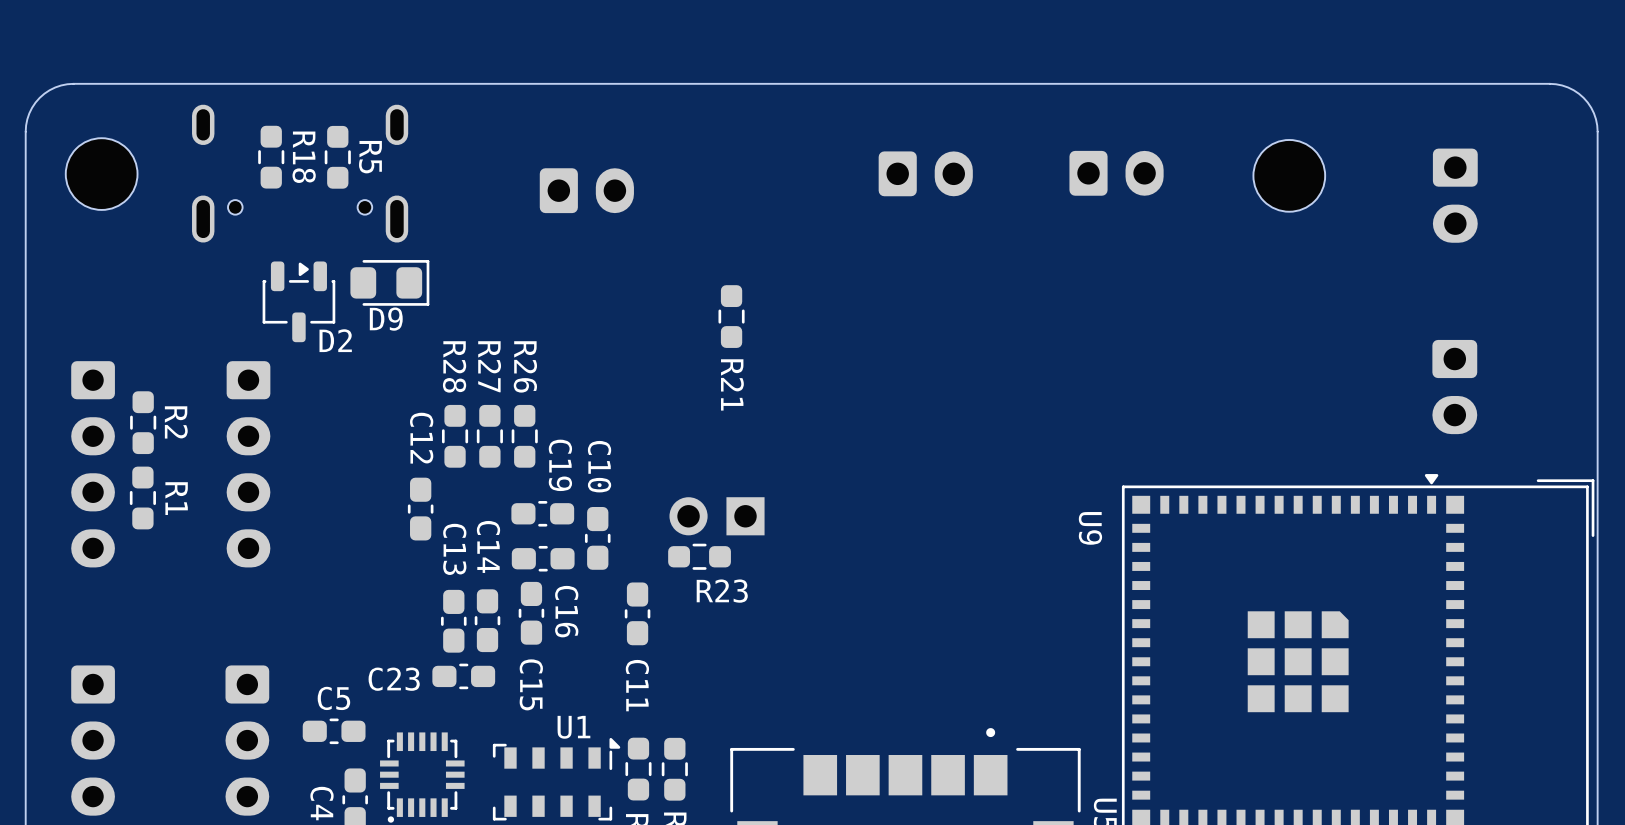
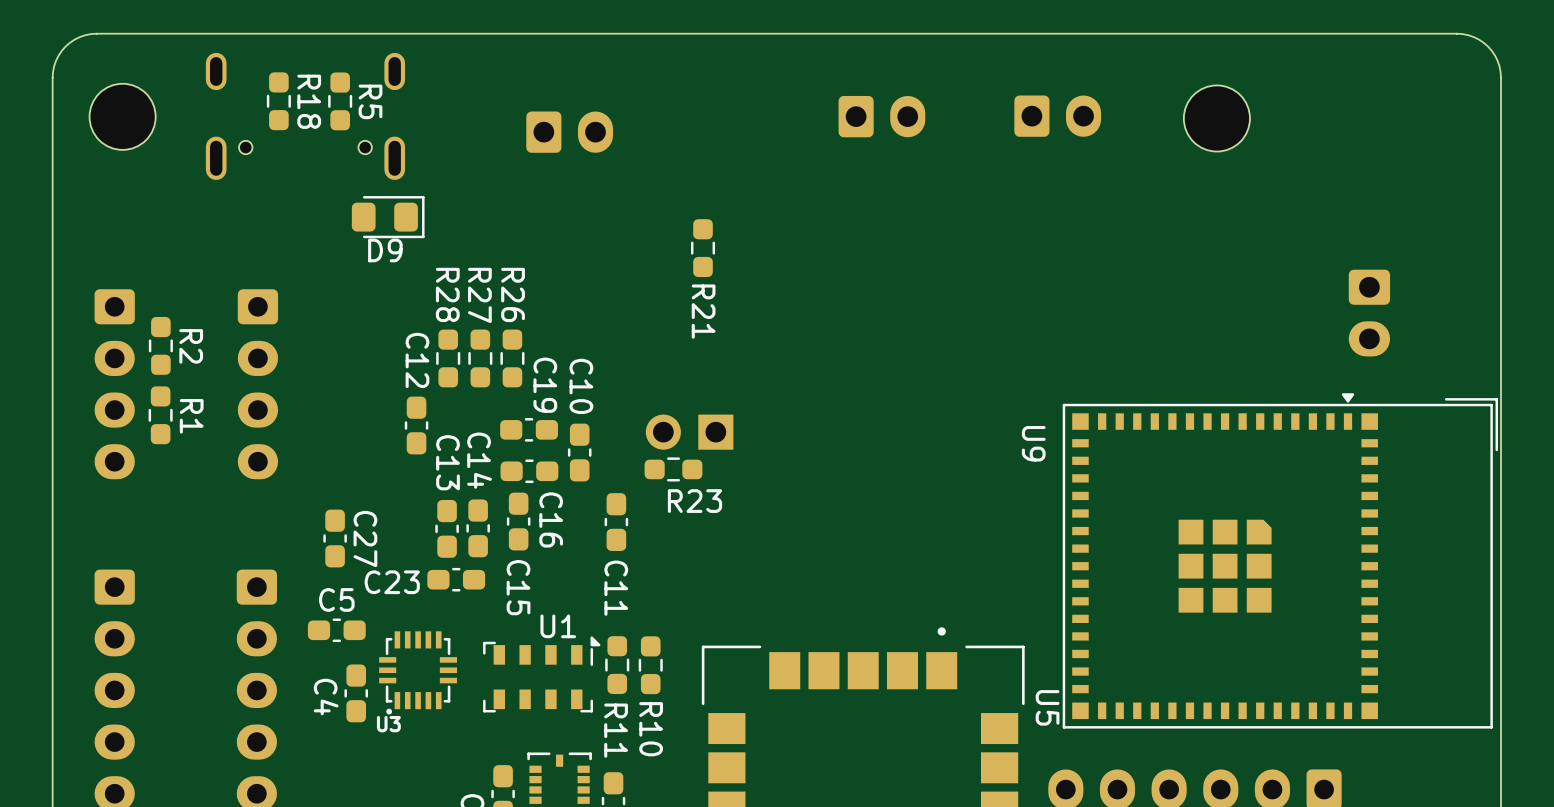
part: (1455, 195) -> none
D2: (298, 301) -> none
C27: none -> (335, 538)

